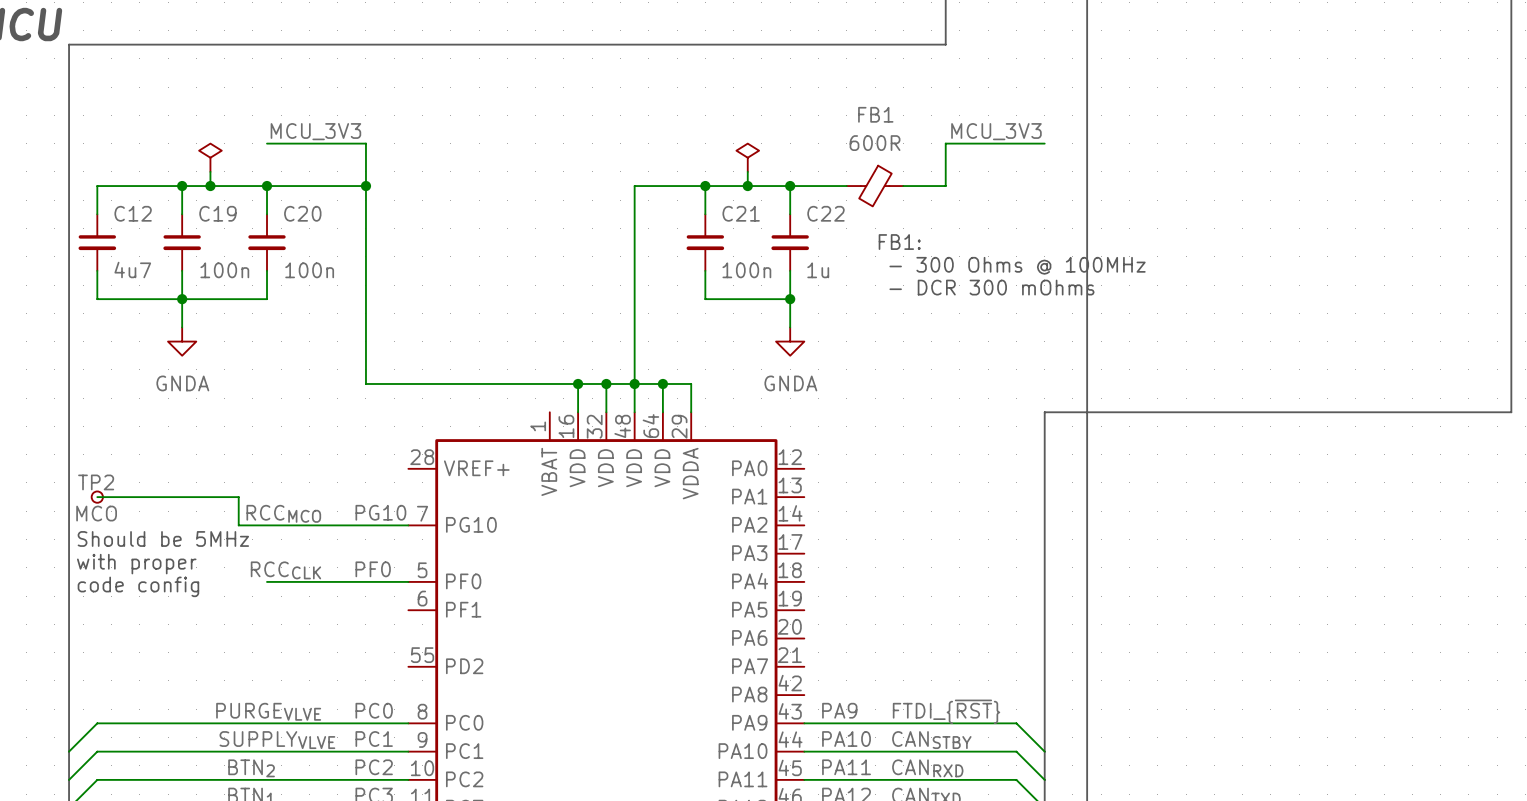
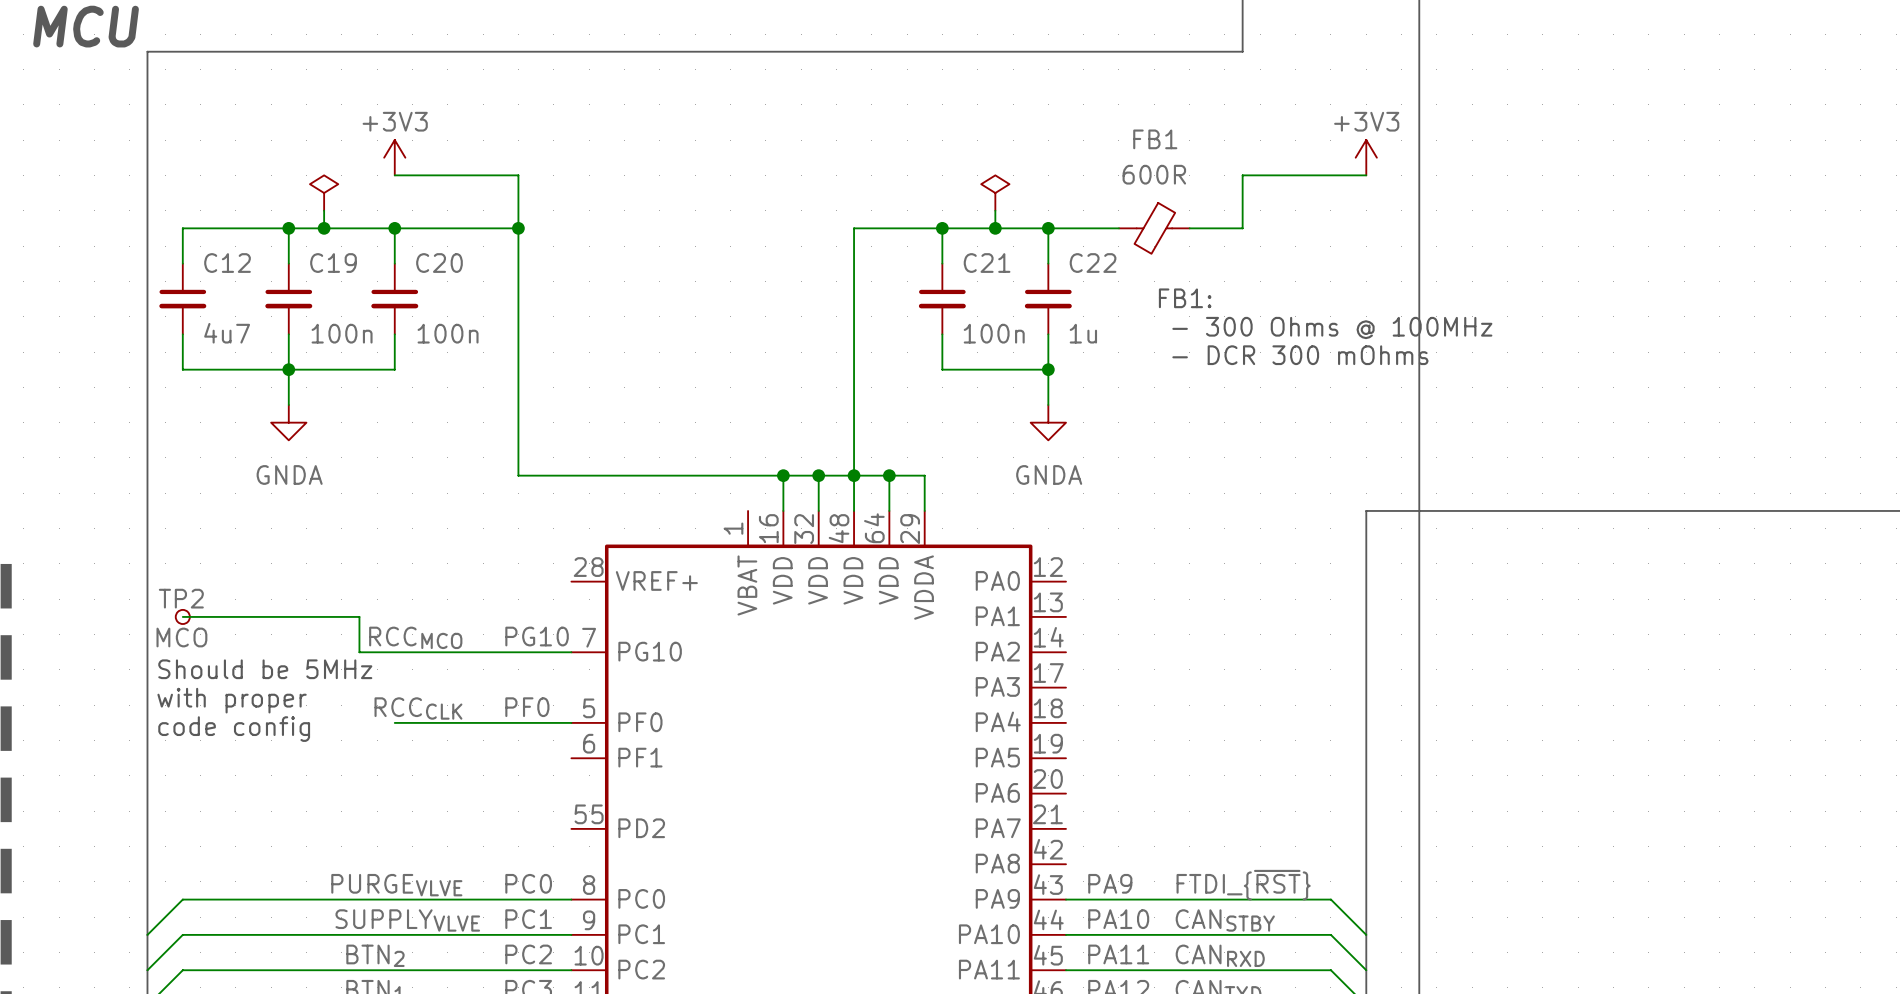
power symbol: none -> +3V3 (394, 157)
power symbol: none -> +3V3 (1366, 157)
label: MCU_3V3 (315, 131) -> none
label: MCU_3V3 (996, 131) -> none

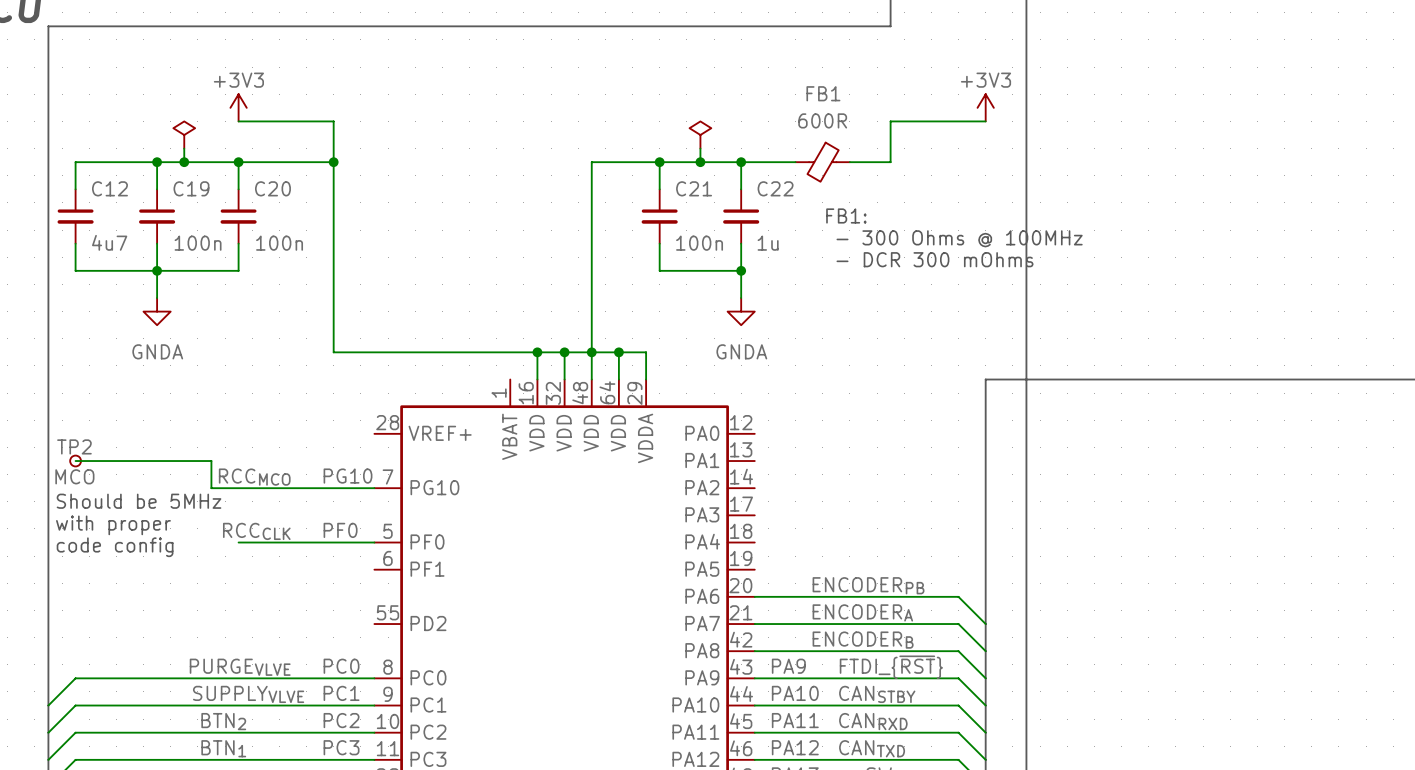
label: none -> ENCODERPB (868, 585)
wire: none -> (754, 596) (958, 596) (985, 624)
label: none -> ENCODERA (862, 612)
wire: none -> (754, 624) (958, 624) (985, 651)
label: none -> ENCODERB (863, 640)
wire: none -> (754, 651) (958, 651) (985, 678)

